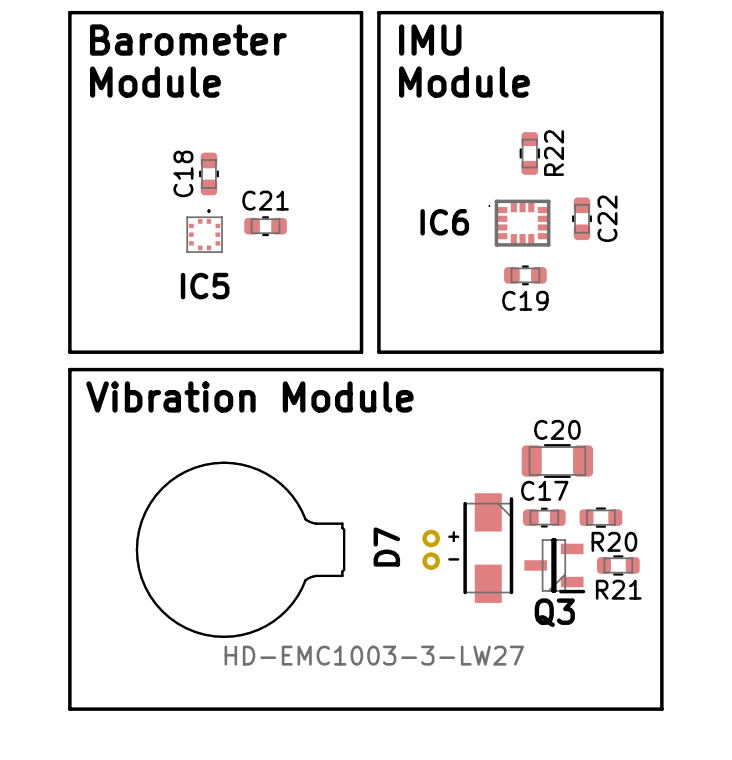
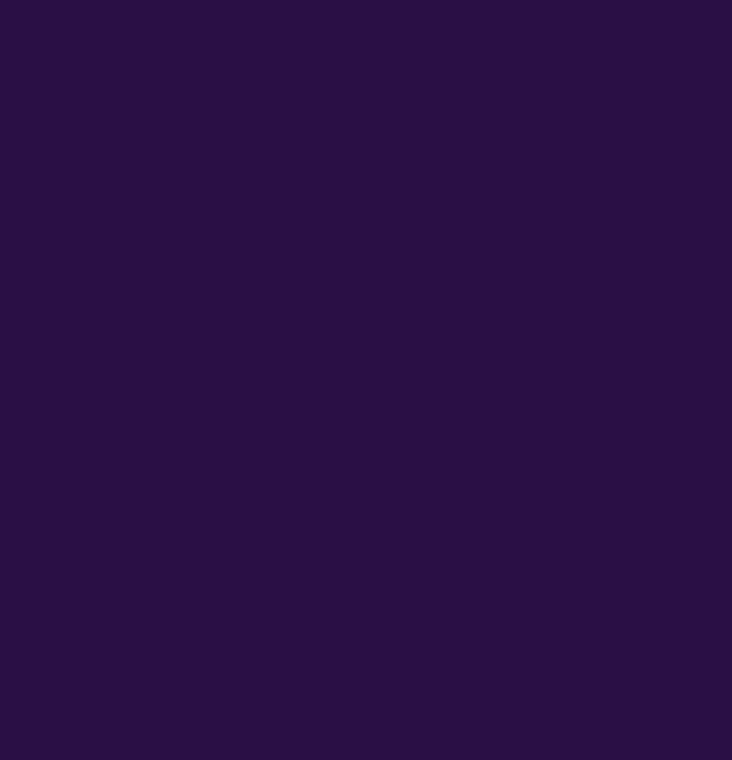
line: (69, 12) (361, 12) (361, 352) (69, 352) (69, 12) -> none
line: (378, 12) (661, 12) (661, 352) (378, 352) (378, 12) -> none
text: Barometer (188, 40) -> none
text: IMU (430, 40) -> none
text: Module (155, 82) -> none
text: Module (464, 82) -> none
R22: (529, 153) -> none
C18: (208, 173) -> none
C22: (582, 218) -> none
IC6: (519, 223) -> none
C21: (265, 226) -> none
IC5: (204, 231) -> none
C19: (525, 275) -> none
line: (69, 369) (661, 369) (661, 709) (69, 709) (69, 369) -> none
text: Vibration Module (249, 396) -> none
C20: (557, 461) -> none
C17: (544, 517) -> none
R20: (600, 517) -> none
D7: (488, 548) -> none
part: HD-EMC1003-3-LW27 (297, 549) -> none
Q3: (554, 565) -> none
R21: (618, 565) -> none

